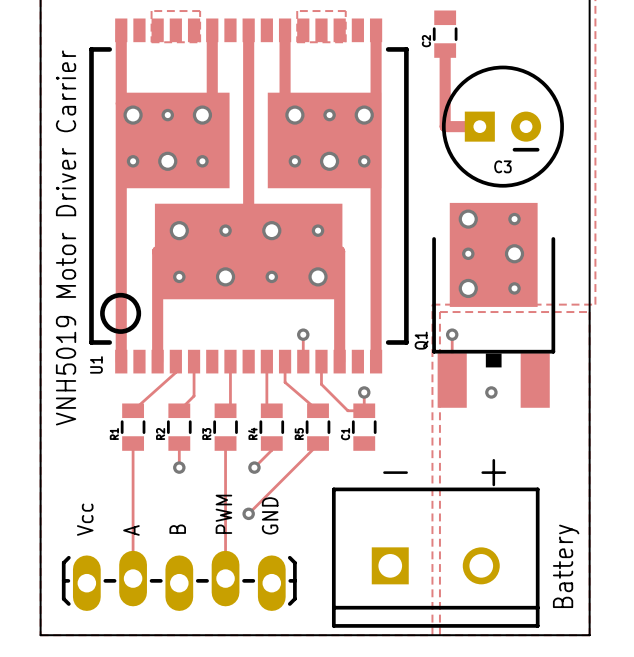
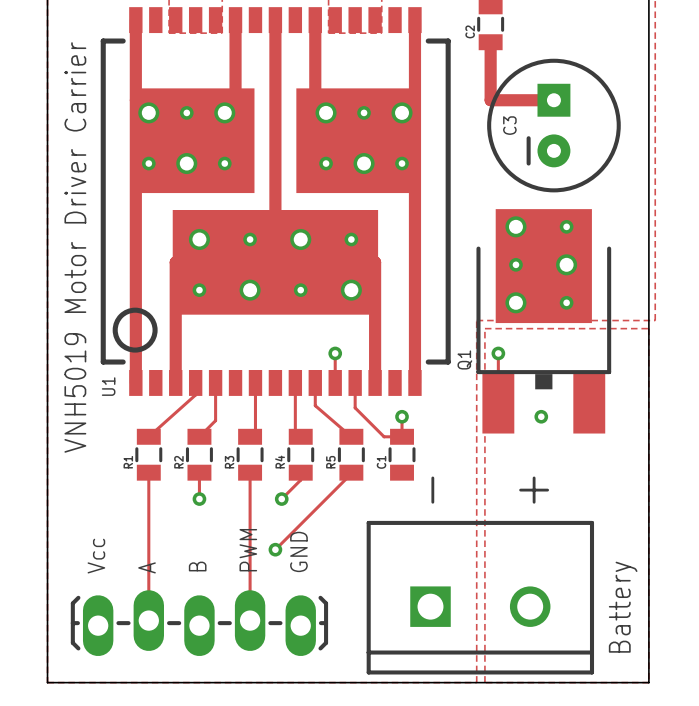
track: (445, 103) (445, 126) (479, 126) -> (490, 100) (553, 100)
C3 rotation: 0° (502, 126) -> 90° clockwise (553, 125)
text rotation: 0° (395, 472) -> 90° counterclockwise (432, 490)
text rotation: 0° (493, 472) -> 90° counterclockwise (534, 490)

